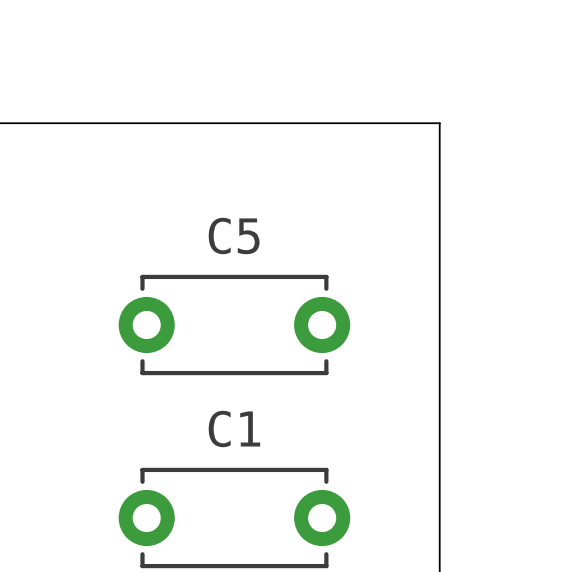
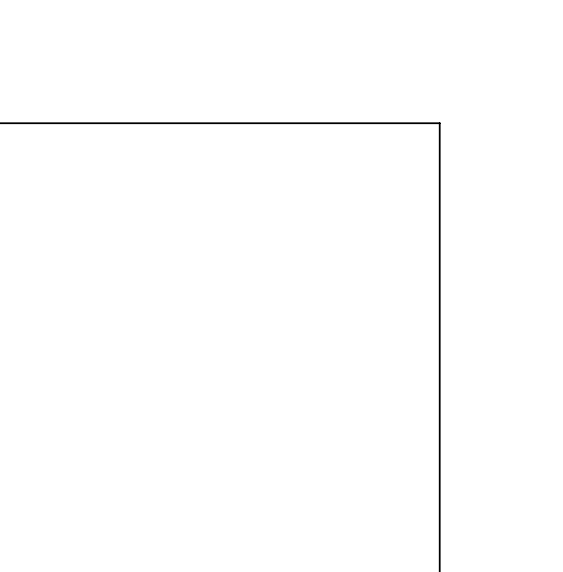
C5: (234, 325) -> none
C1: (234, 518) -> none

